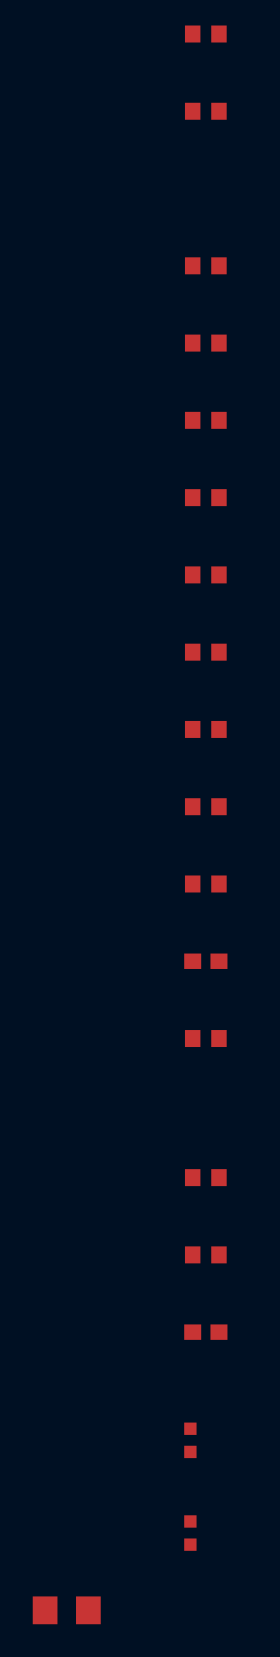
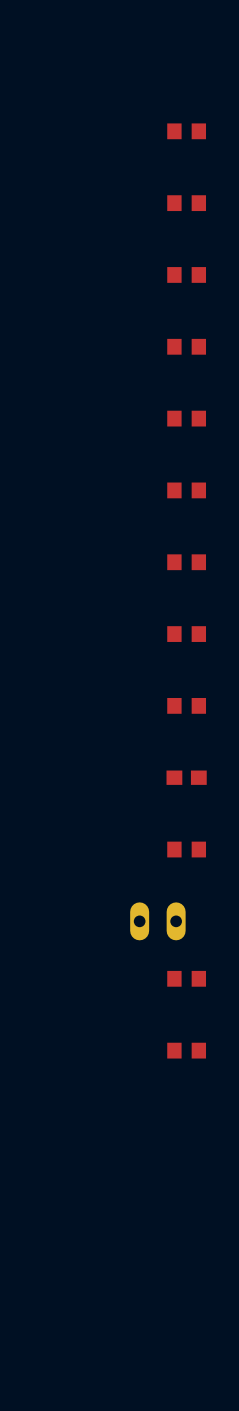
part: none -> (157, 921)
part: (205, 1332) -> none
part: (190, 1440) -> none
part: (190, 1533) -> none
part: (66, 1610) -> none

